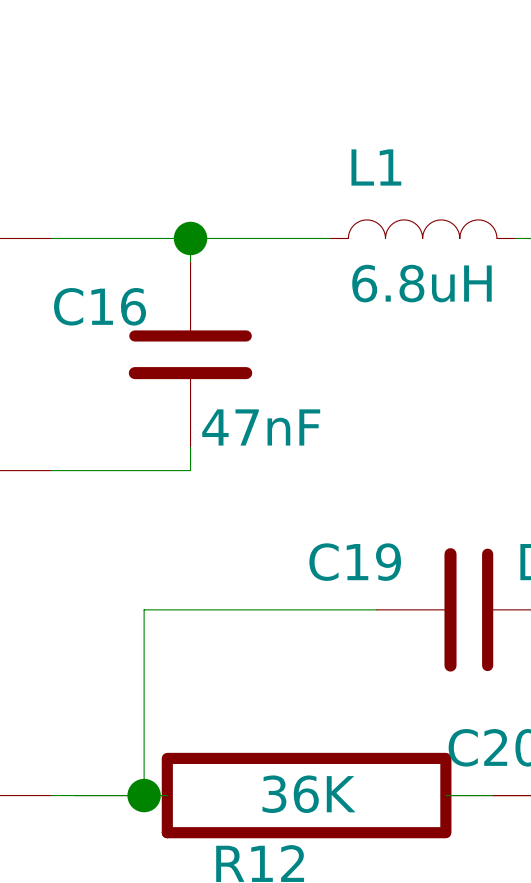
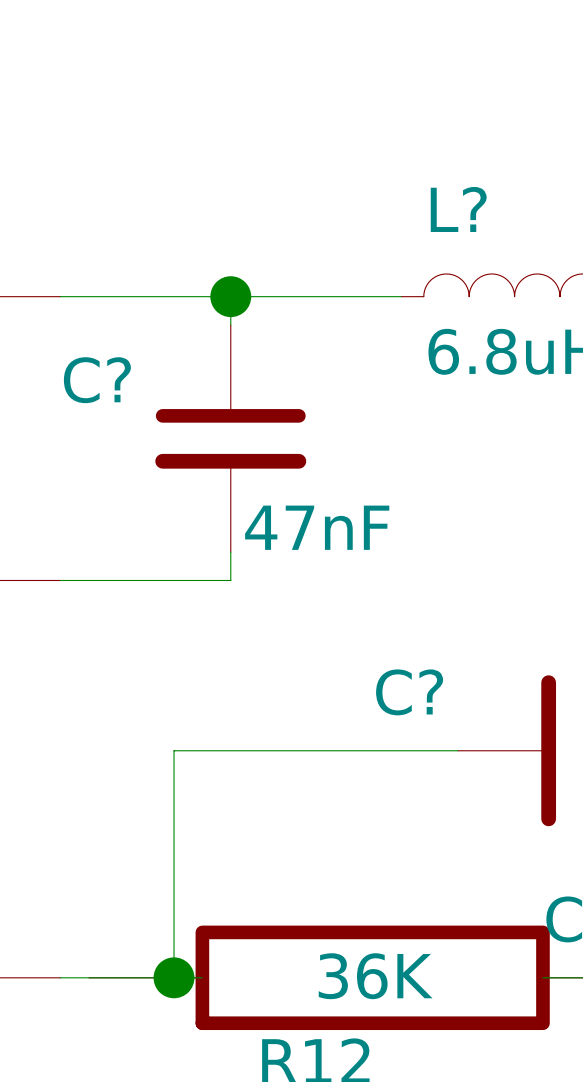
L1 name: L1 (376, 167) -> L? (458, 209)
C16 name: C16 (100, 306) -> C? (97, 380)
C19 name: C19 (355, 562) -> C? (409, 692)

